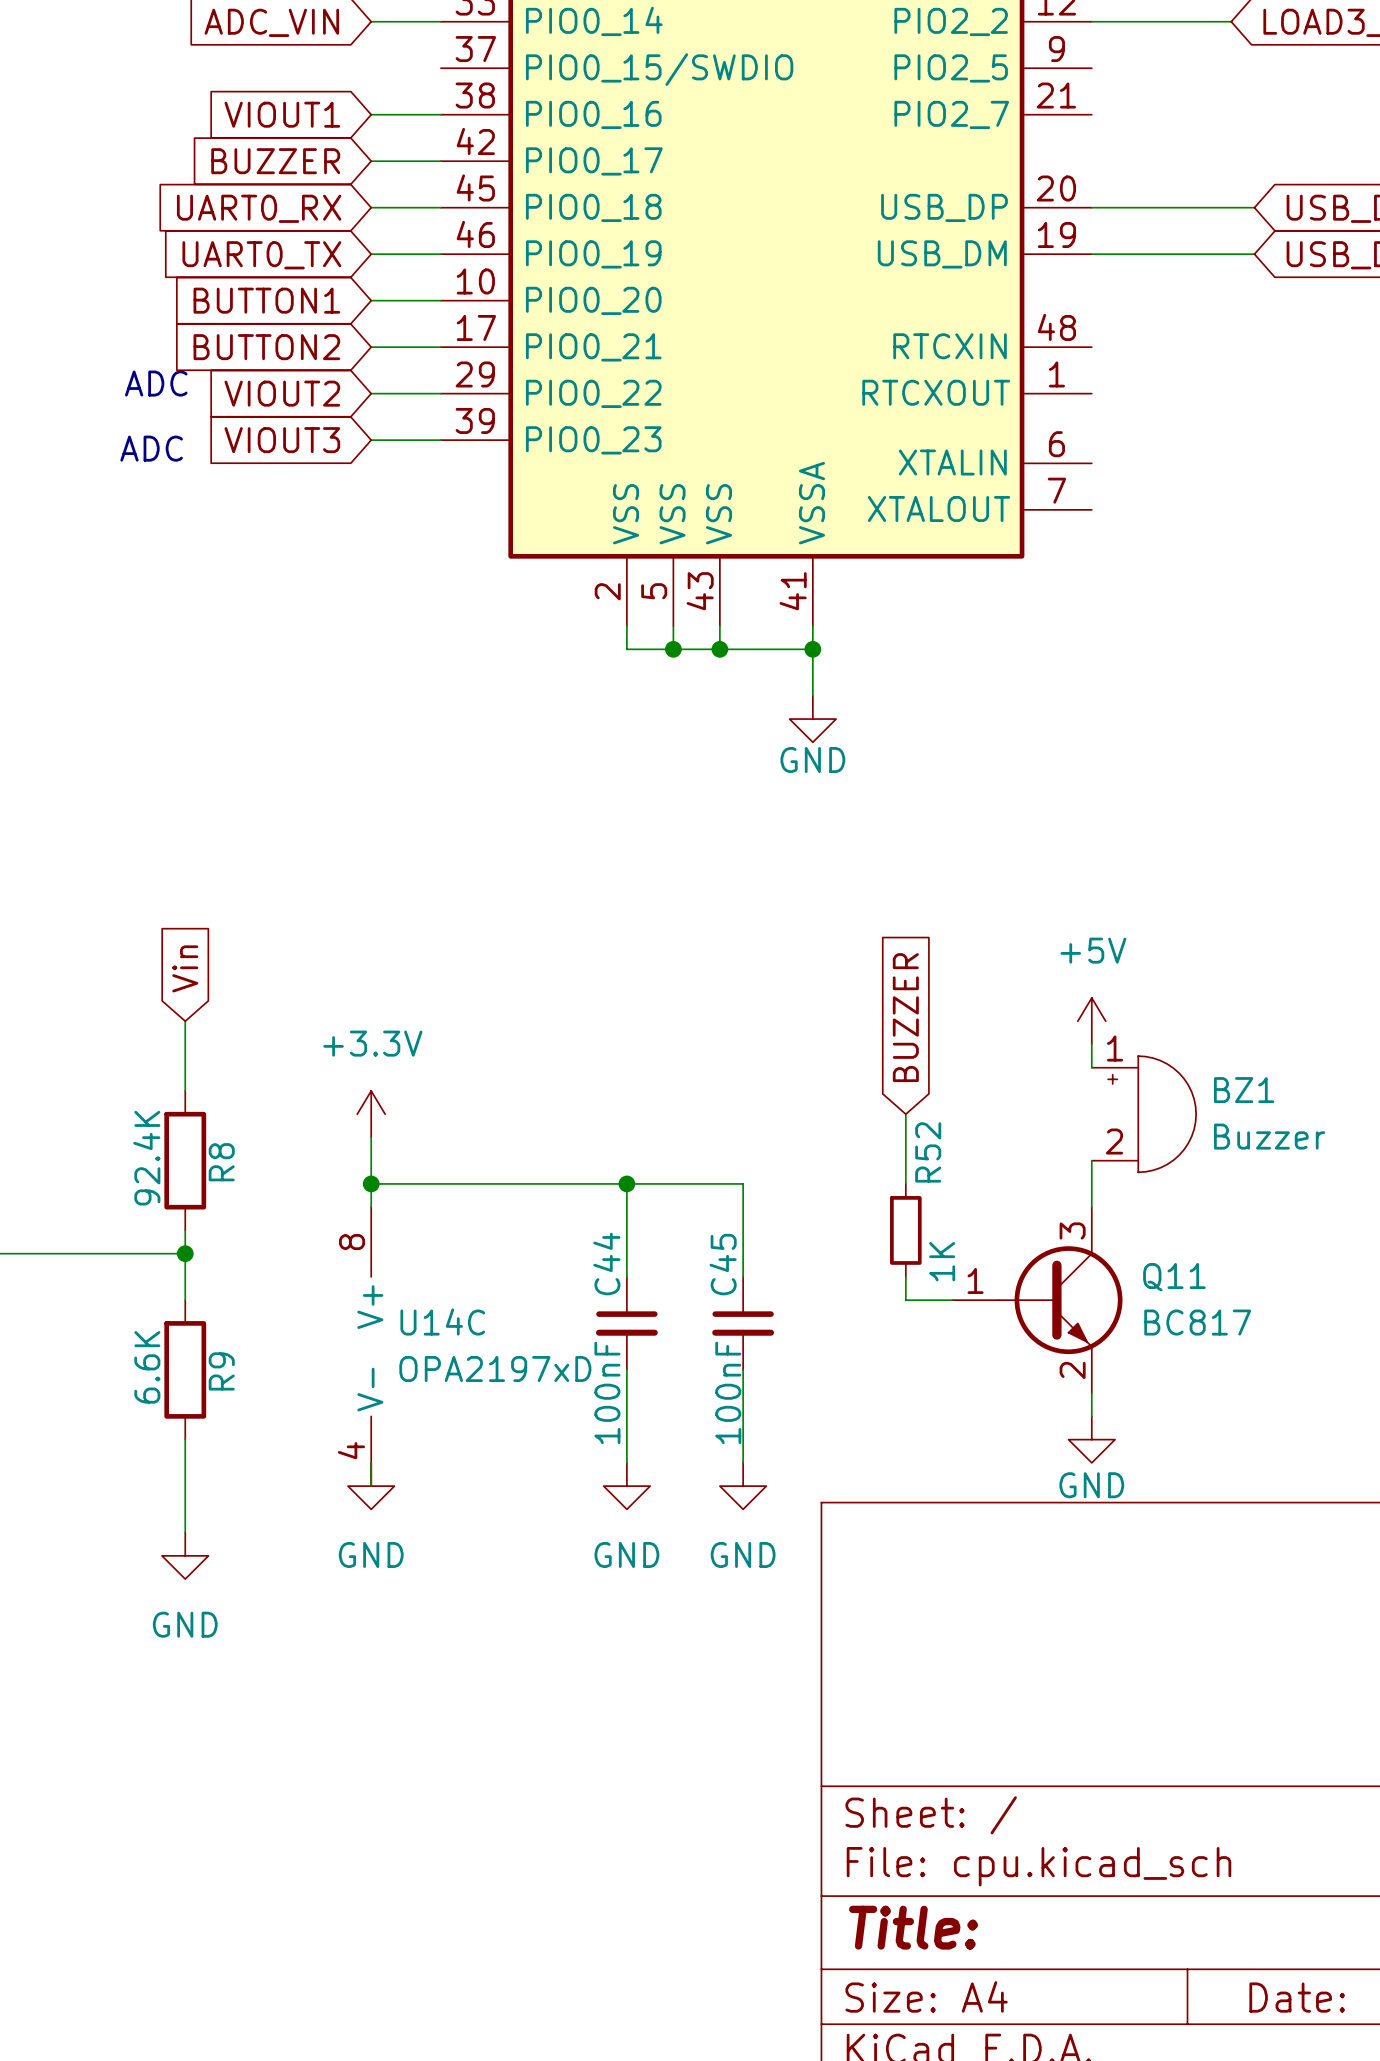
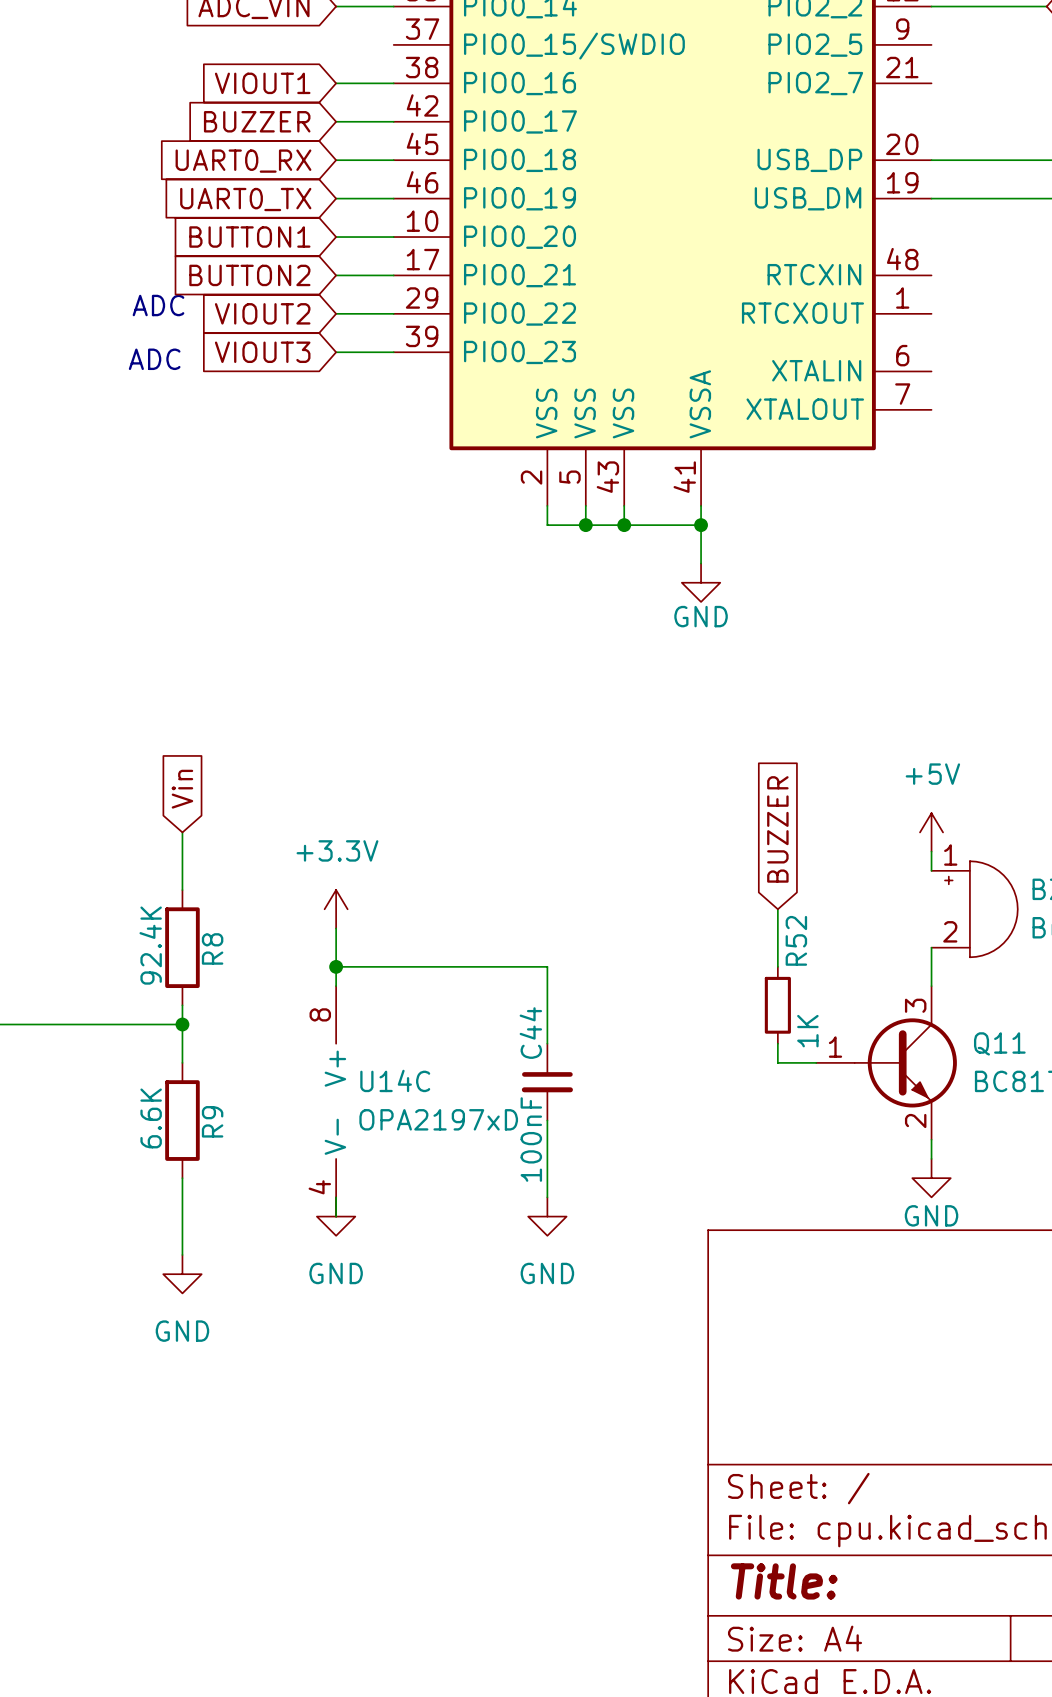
wire: (626, 1183) (743, 1183) (743, 1276) -> none
junction: (626, 1183) -> none
C45: 100nF (743, 1323) -> none
wire: (743, 1369) (743, 1462) -> none
power symbol: GND (743, 1486) -> none

